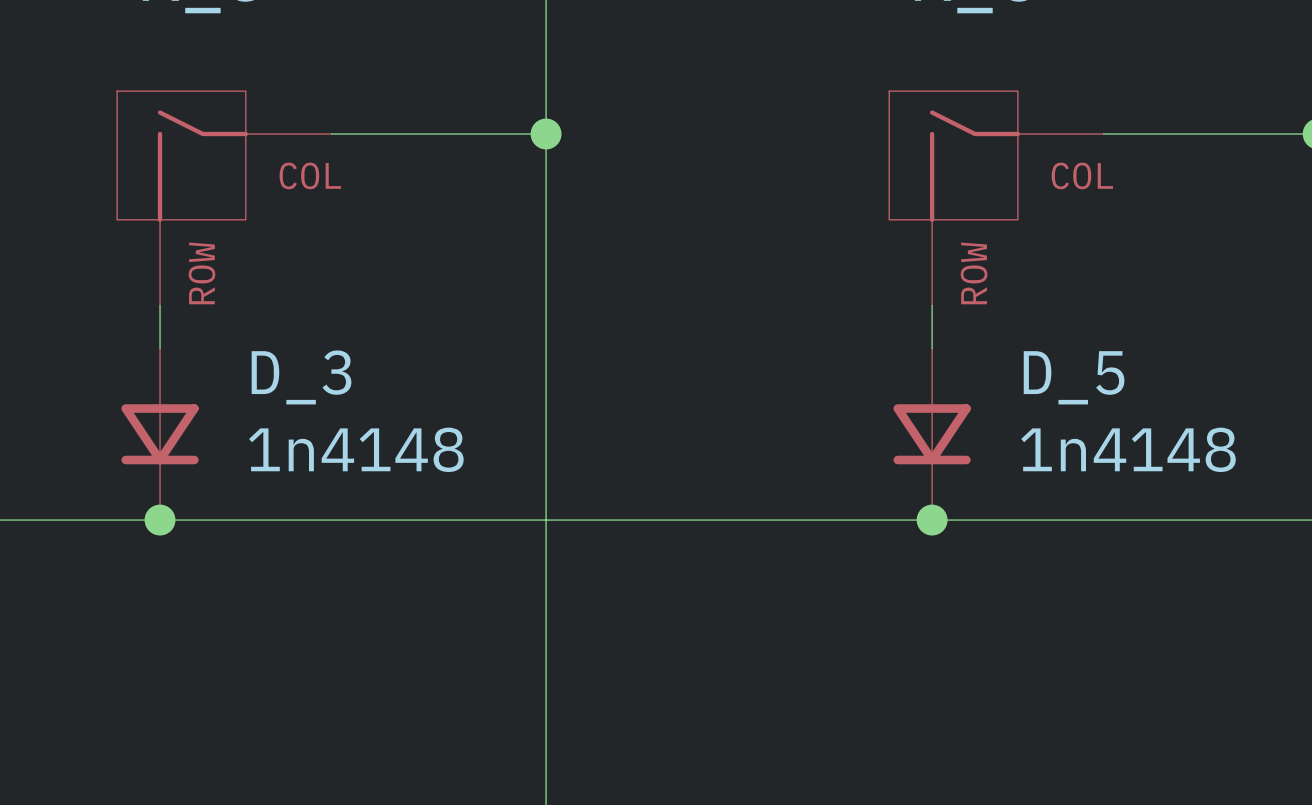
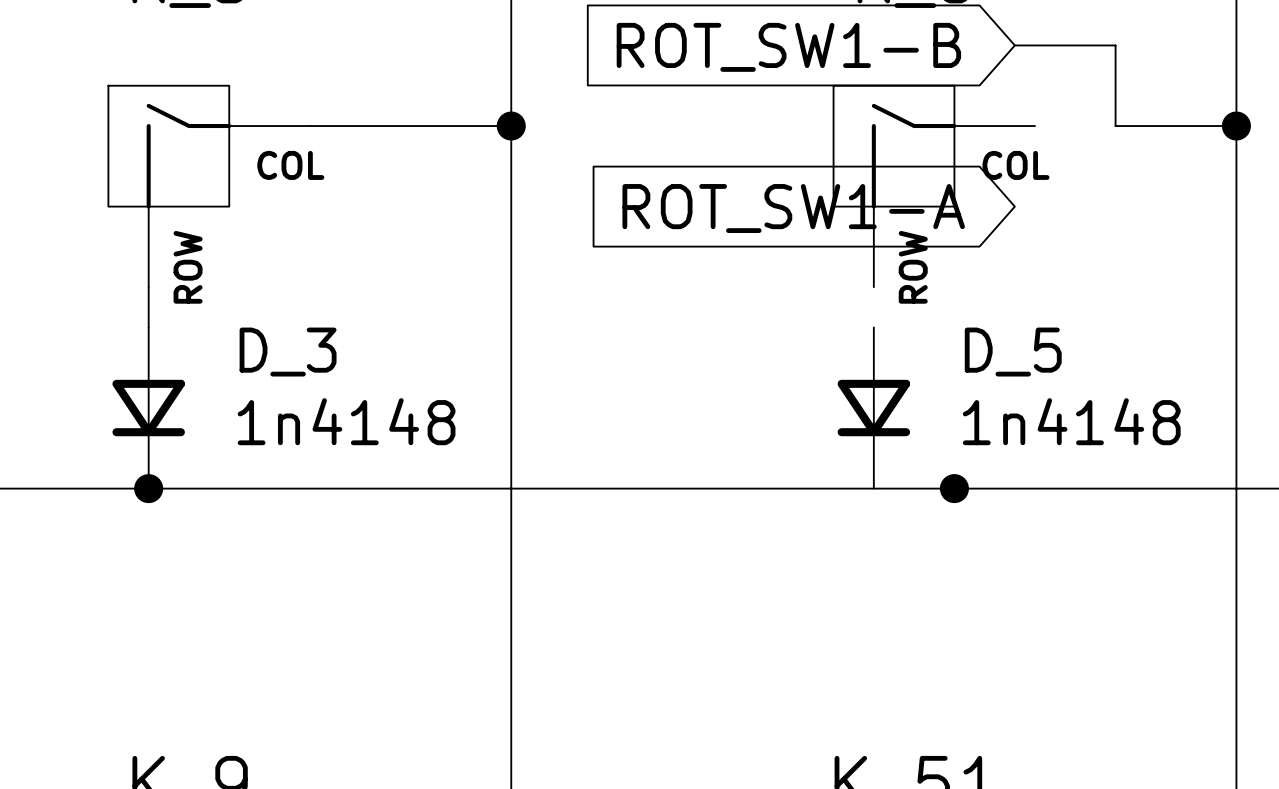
global label: none -> ROT_SW1-B (788, 47)
wire: (1103, 134) (1189, 134) -> (1014, 45) (1115, 45) (1115, 126)
global label: none -> ROT_SW1-A (793, 208)
wire: (932, 305) (932, 348) -> none
junction position: (932, 520) -> (954, 488)

